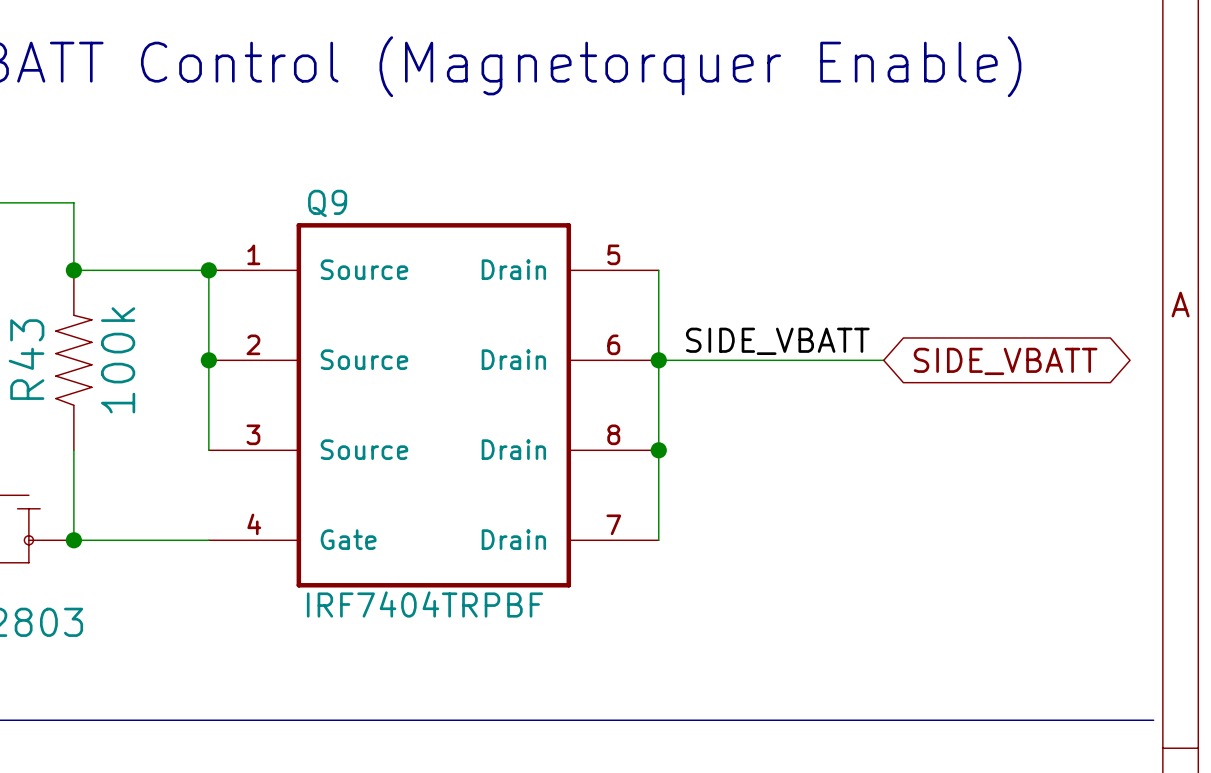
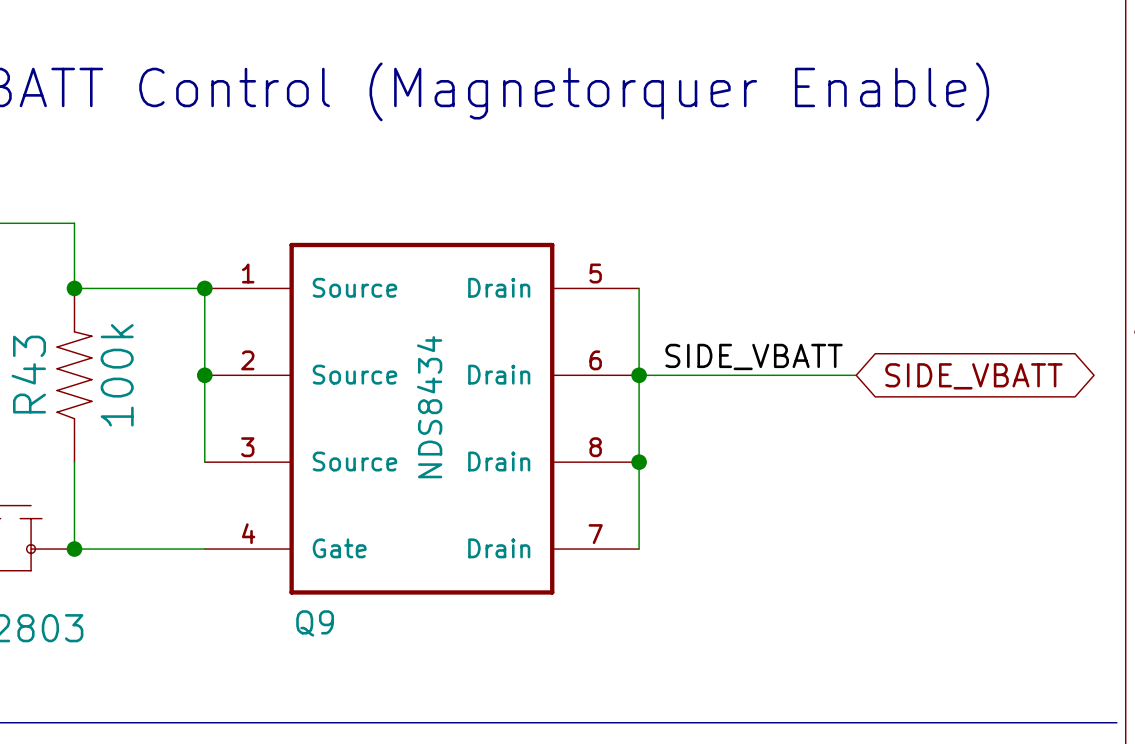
Q9 name position: Q9 (327, 203) -> Q9 (315, 623)
Q9 value: IRF7404TRPBF (424, 604) -> NDS8434 (429, 407)

